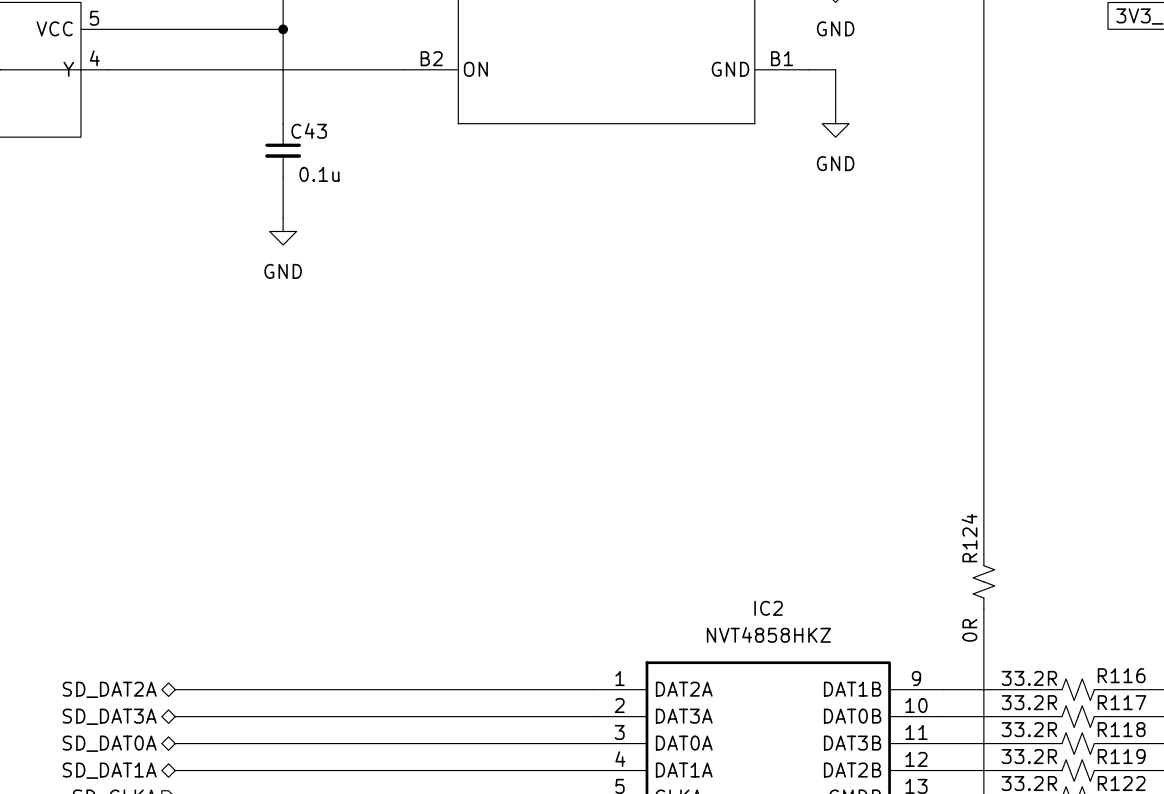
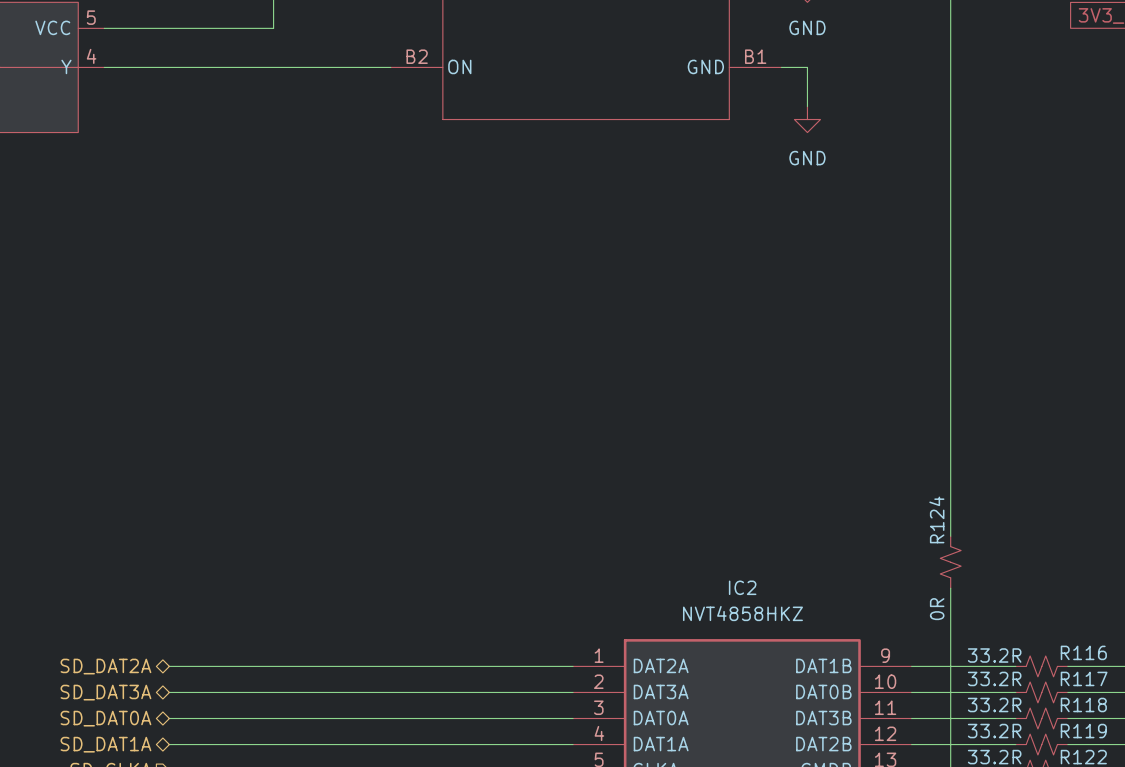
wire: (283, 29) (283, 123) -> none
junction: (283, 29) -> none
C43: 0.1u (283, 150) -> none
wire: (283, 177) (283, 218) -> none
power symbol: GND (283, 231) -> none

